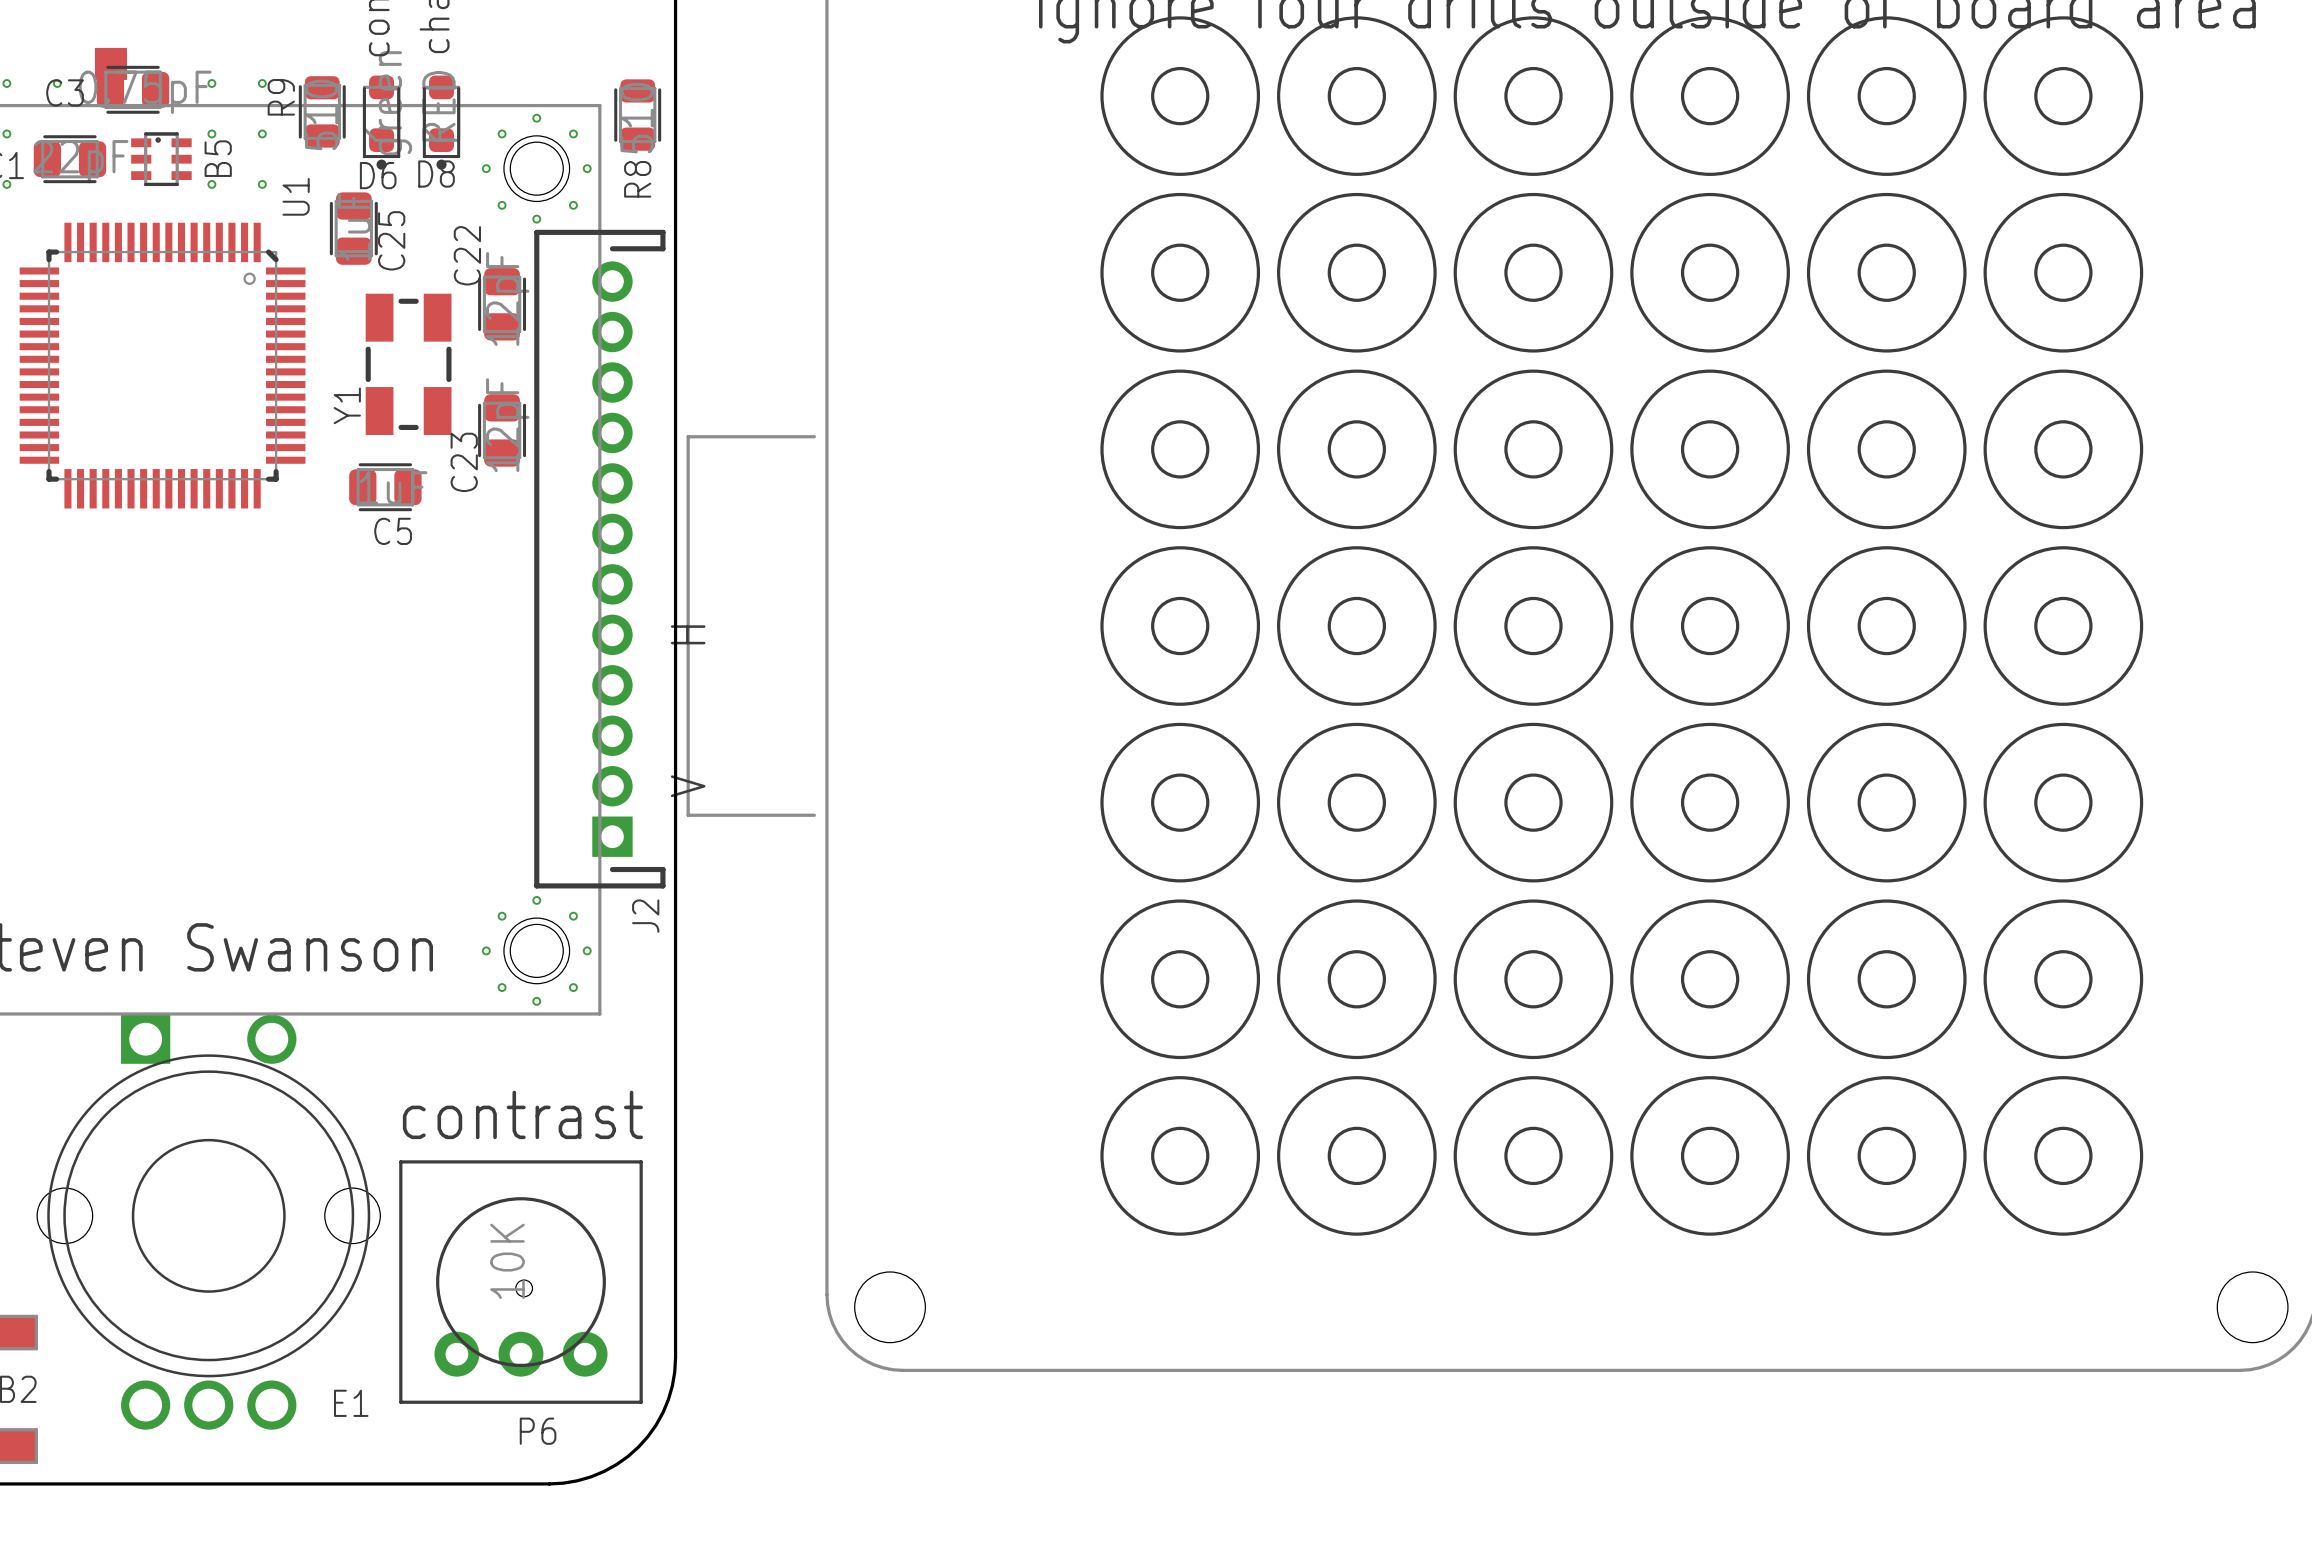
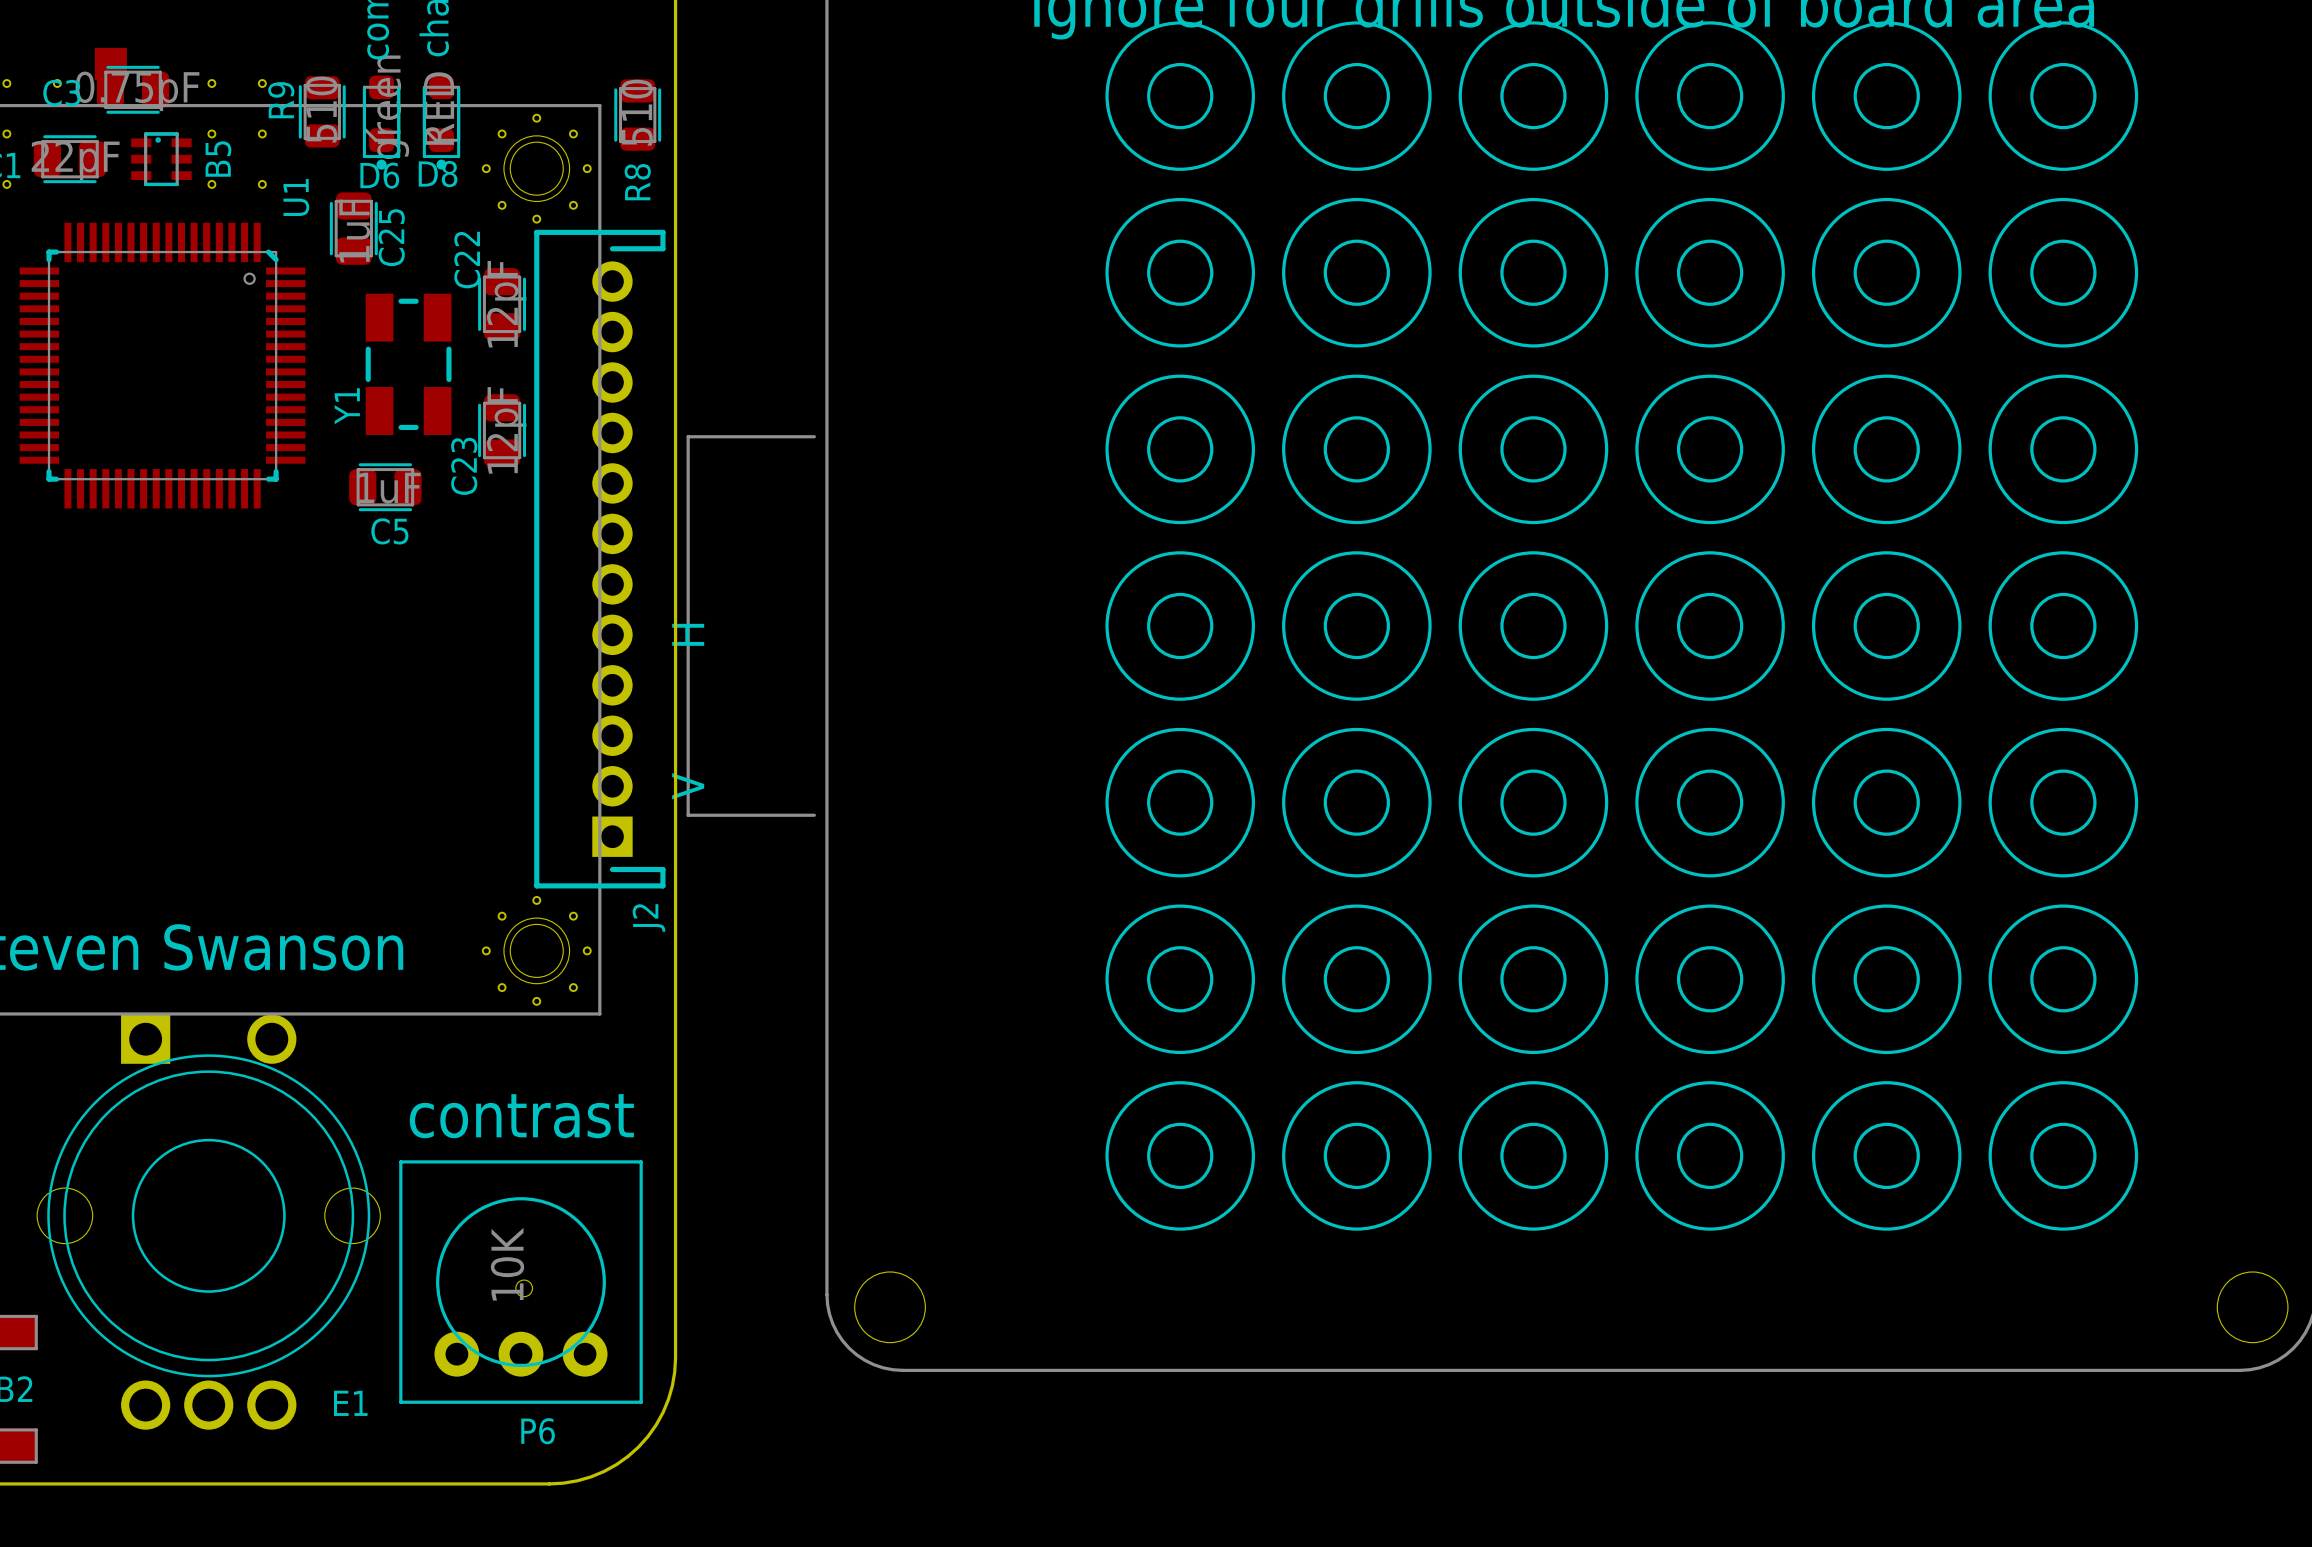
drawing shape: [1100, 16, 1261, 176] -> [1105, 21, 1255, 171]
drawing shape: [1277, 16, 1437, 176] -> [1282, 21, 1432, 171]
drawing shape: [1453, 16, 1614, 176] -> [1458, 21, 1609, 171]
drawing shape: [1630, 16, 1790, 176] -> [1635, 21, 1785, 171]
drawing shape: [1806, 16, 1967, 176] -> [1811, 21, 1962, 171]
drawing shape: [1983, 16, 2144, 176] -> [1988, 21, 2139, 171]
drawing shape: [1100, 192, 1261, 353] -> [1105, 197, 1255, 348]
drawing shape: [1277, 192, 1437, 353] -> [1282, 197, 1432, 348]
drawing shape: [1453, 192, 1614, 353] -> [1458, 197, 1609, 348]
drawing shape: [1630, 192, 1790, 353] -> [1635, 197, 1785, 348]
drawing shape: [1806, 192, 1967, 353] -> [1811, 197, 1962, 348]
drawing shape: [1983, 192, 2144, 353] -> [1988, 197, 2139, 348]
drawing shape: [1100, 369, 1261, 530] -> [1105, 374, 1255, 525]
drawing shape: [1277, 369, 1437, 530] -> [1282, 374, 1432, 525]
drawing shape: [1453, 369, 1614, 530] -> [1458, 374, 1609, 525]
drawing shape: [1630, 369, 1790, 530] -> [1635, 374, 1785, 525]
drawing shape: [1806, 369, 1967, 530] -> [1811, 374, 1962, 525]
drawing shape: [1983, 369, 2144, 530] -> [1988, 374, 2139, 525]
drawing shape: [1100, 546, 1261, 706] -> [1105, 551, 1255, 701]
drawing shape: [1277, 546, 1437, 706] -> [1282, 551, 1432, 701]
drawing shape: [1453, 546, 1614, 706] -> [1458, 551, 1609, 701]
drawing shape: [1630, 546, 1790, 706] -> [1635, 551, 1785, 701]
drawing shape: [1806, 546, 1967, 706] -> [1811, 551, 1962, 701]
drawing shape: [1983, 546, 2144, 706] -> [1988, 551, 2139, 701]
drawing shape: [1100, 722, 1261, 883] -> [1105, 727, 1255, 878]
drawing shape: [1277, 722, 1437, 883] -> [1282, 727, 1432, 878]
drawing shape: [1453, 722, 1614, 883] -> [1458, 727, 1609, 878]
drawing shape: [1630, 722, 1790, 883] -> [1635, 727, 1785, 878]
drawing shape: [1806, 722, 1967, 883] -> [1811, 727, 1962, 878]
drawing shape: [1983, 722, 2144, 883] -> [1988, 727, 2139, 878]
drawing shape: [1100, 899, 1261, 1060] -> [1105, 904, 1255, 1055]
drawing shape: [1277, 899, 1437, 1060] -> [1282, 904, 1432, 1055]
drawing shape: [1453, 899, 1614, 1060] -> [1458, 904, 1609, 1055]
drawing shape: [1630, 899, 1790, 1060] -> [1635, 904, 1785, 1055]
drawing shape: [1806, 899, 1967, 1060] -> [1811, 904, 1962, 1055]
drawing shape: [1983, 899, 2144, 1060] -> [1988, 904, 2139, 1055]
drawing shape: [1100, 1076, 1261, 1236] -> [1105, 1081, 1255, 1231]
drawing shape: [1277, 1076, 1437, 1236] -> [1282, 1081, 1432, 1231]
drawing shape: [1453, 1076, 1614, 1236] -> [1458, 1081, 1609, 1231]
drawing shape: [1630, 1076, 1790, 1236] -> [1635, 1081, 1785, 1231]
drawing shape: [1806, 1076, 1967, 1236] -> [1811, 1081, 1962, 1231]
drawing shape: [1983, 1076, 2144, 1236] -> [1988, 1081, 2139, 1231]

